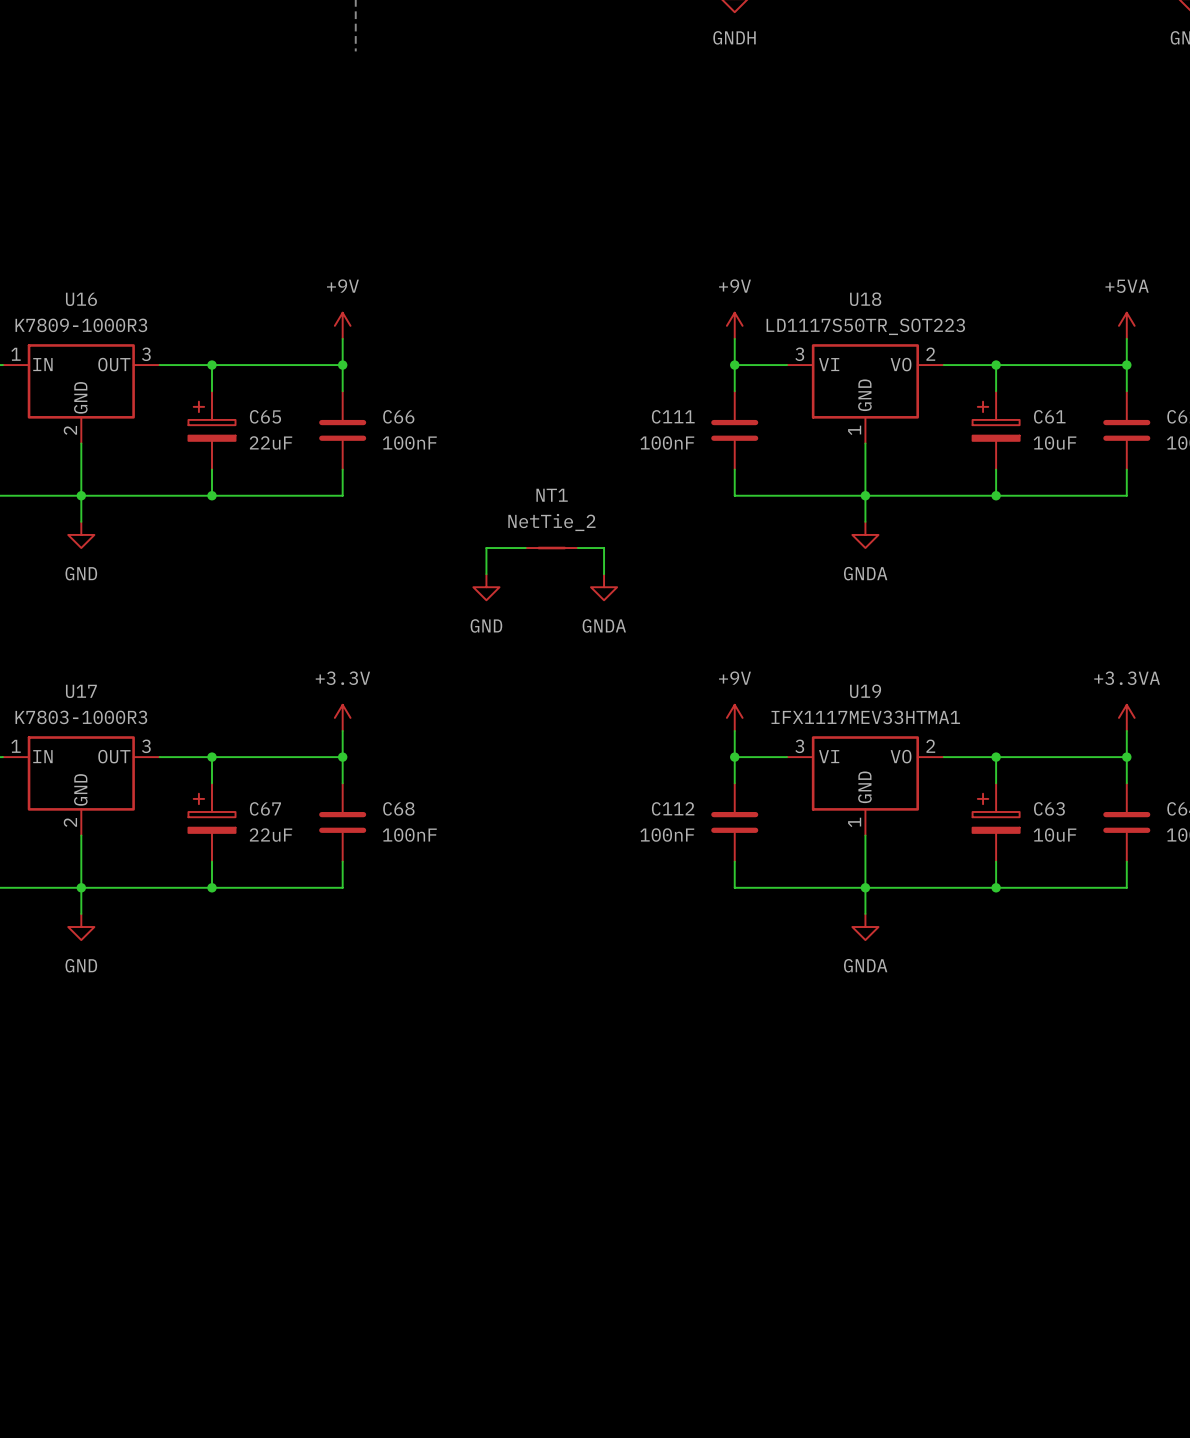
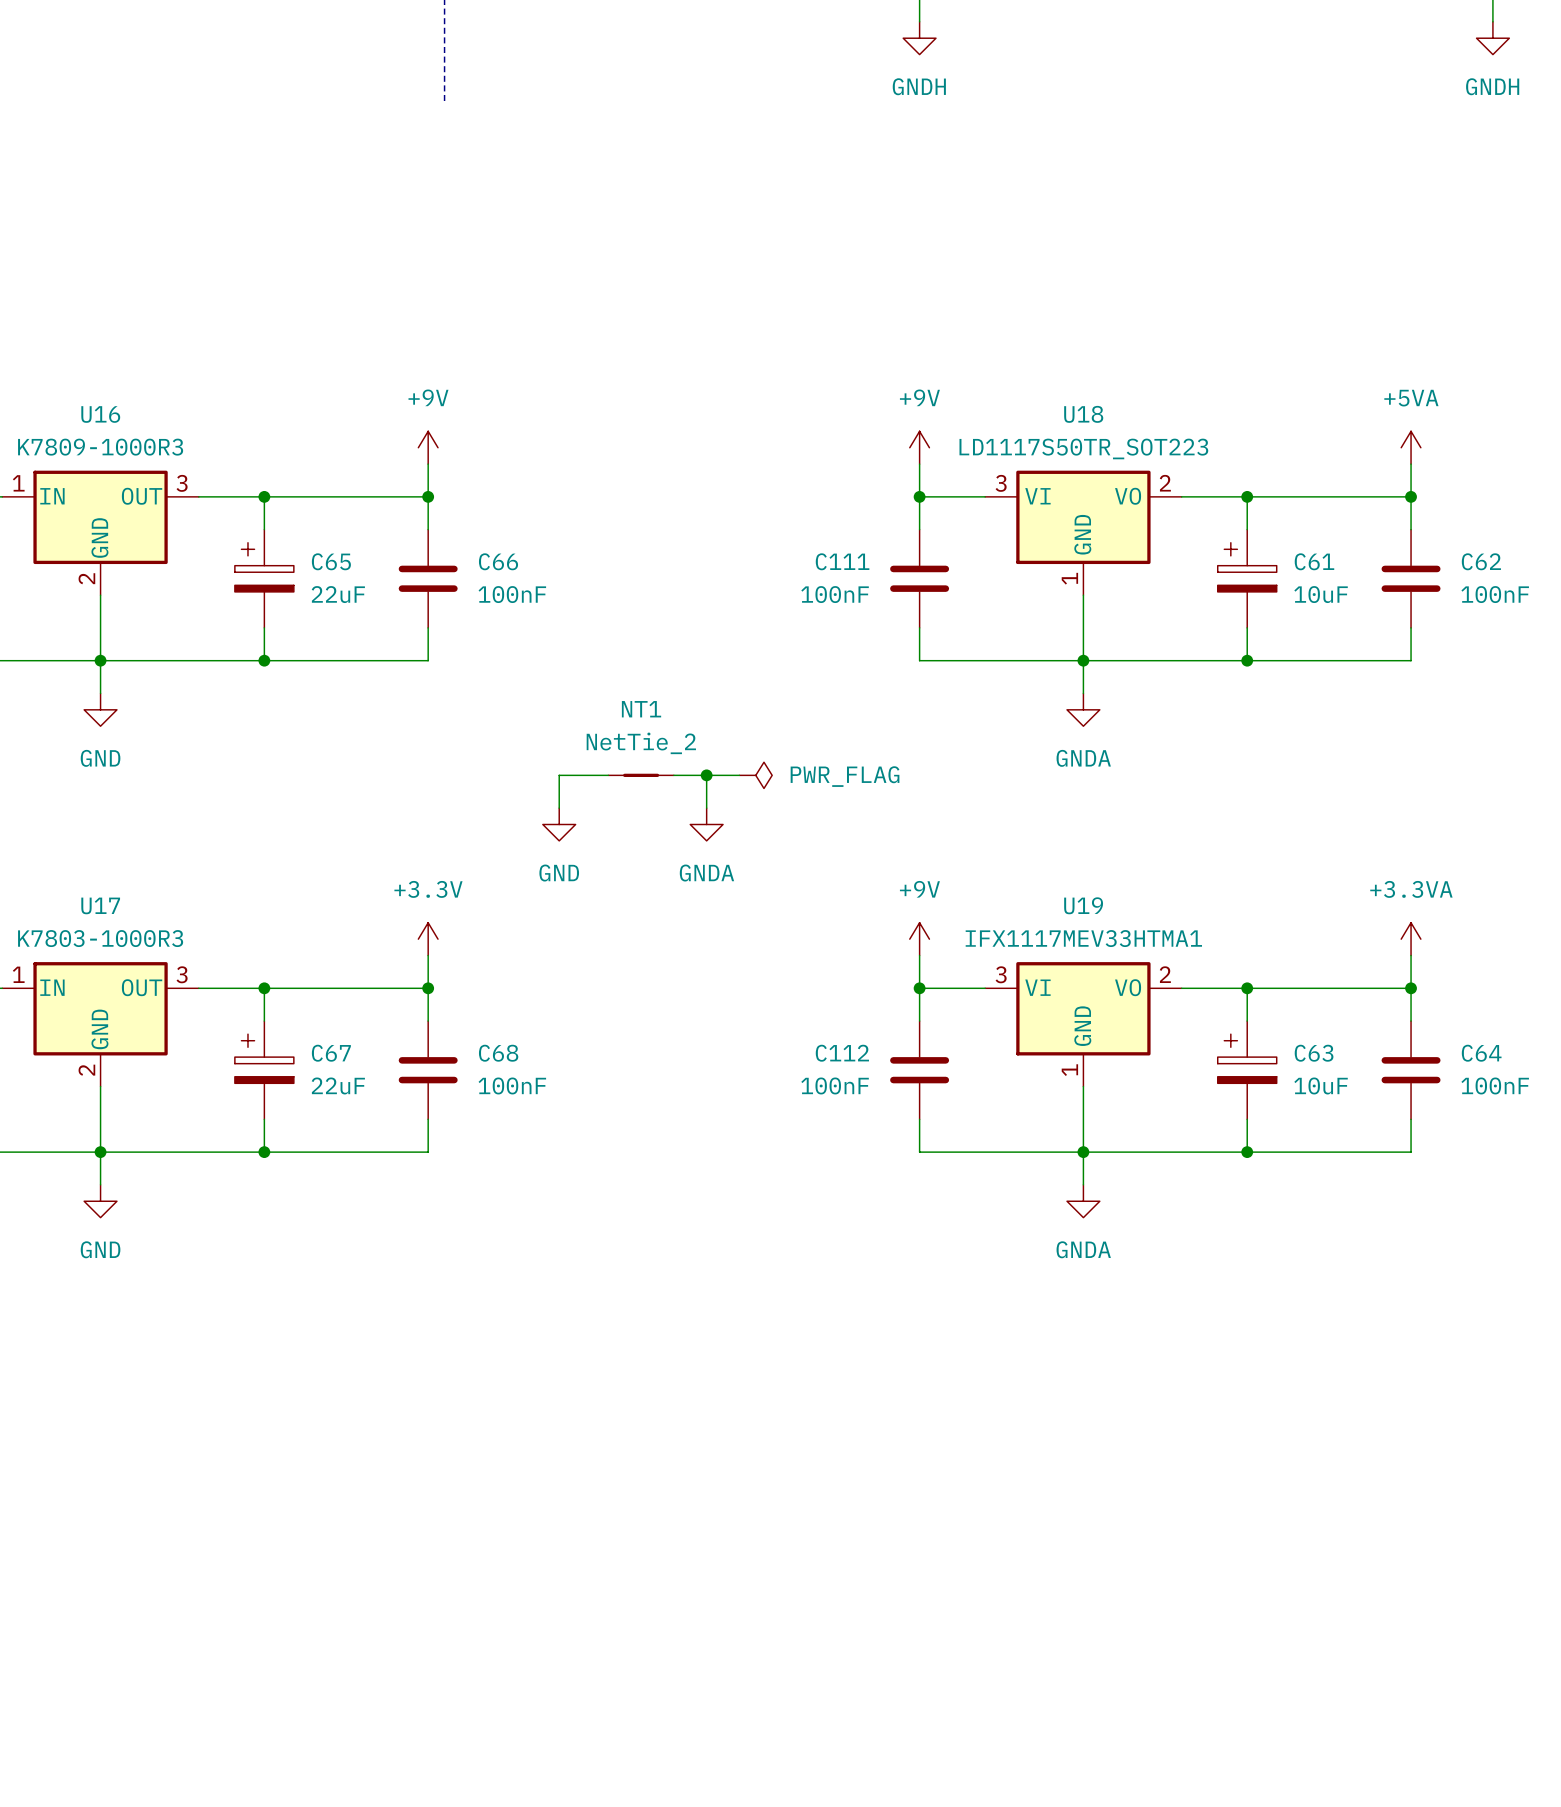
wire: (525, 548) (486, 548) (486, 574) -> (608, 775) (559, 775) (559, 808)
NT1 position: (551, 548) -> (641, 775)
wire: (577, 548) (604, 548) (604, 574) -> none
power symbol position: GND (486, 587) -> GND (559, 824)
wire: none -> (673, 775) (739, 775)
wire: none -> (706, 775) (706, 808)
junction: none -> (706, 775)
power symbol: GNDA (604, 587) -> PWR_FLAG (755, 775)
power symbol: none -> GNDA (706, 824)

